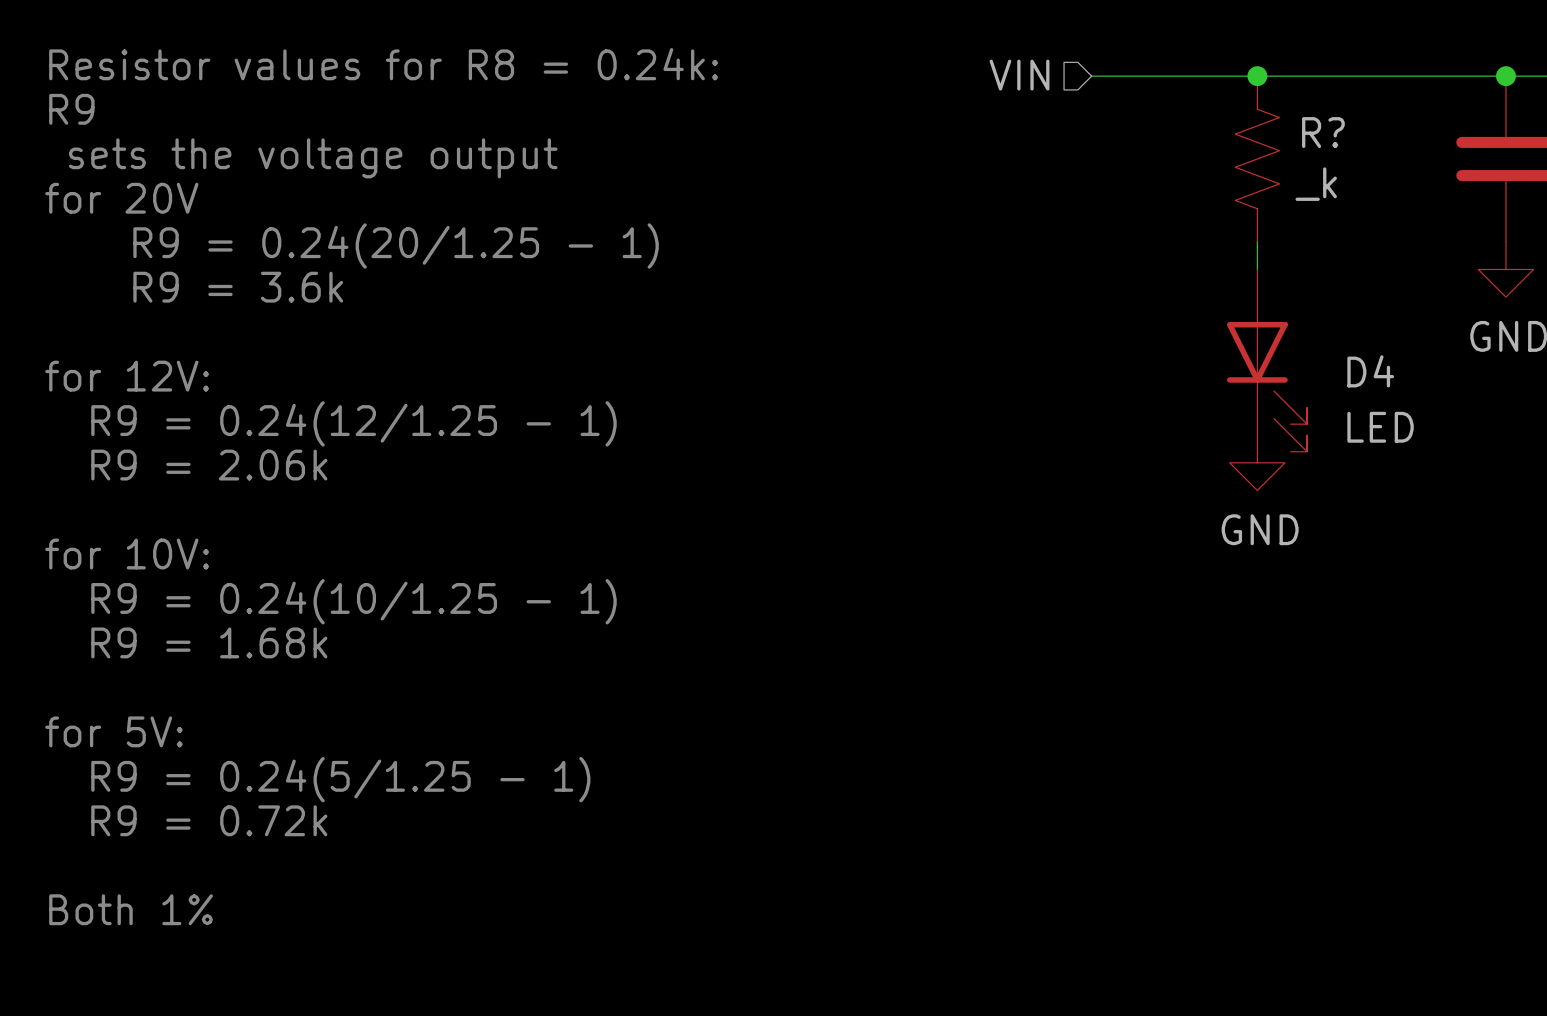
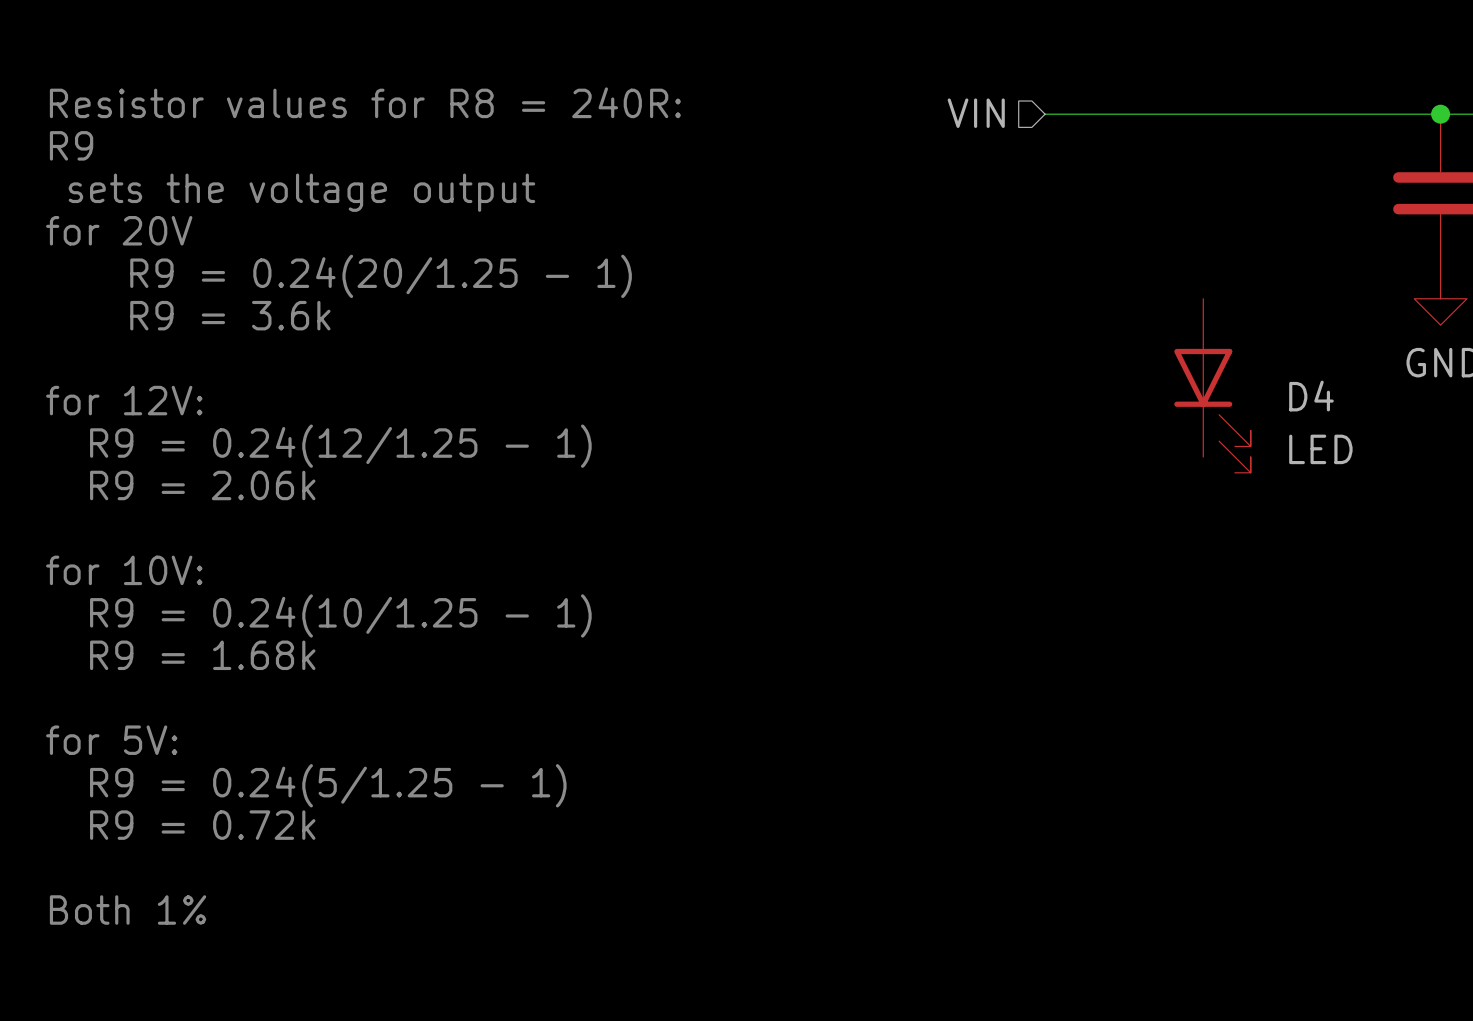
text: Resistor values for R8 = 0.24k: (383, 64) -> Resistor values for R8 = 240R: (365, 102)
junction: (1257, 76) -> none
R?: _k (1257, 158) -> none
wire: (1257, 241) (1257, 269) -> none
power symbol: GND (1257, 462) -> none

